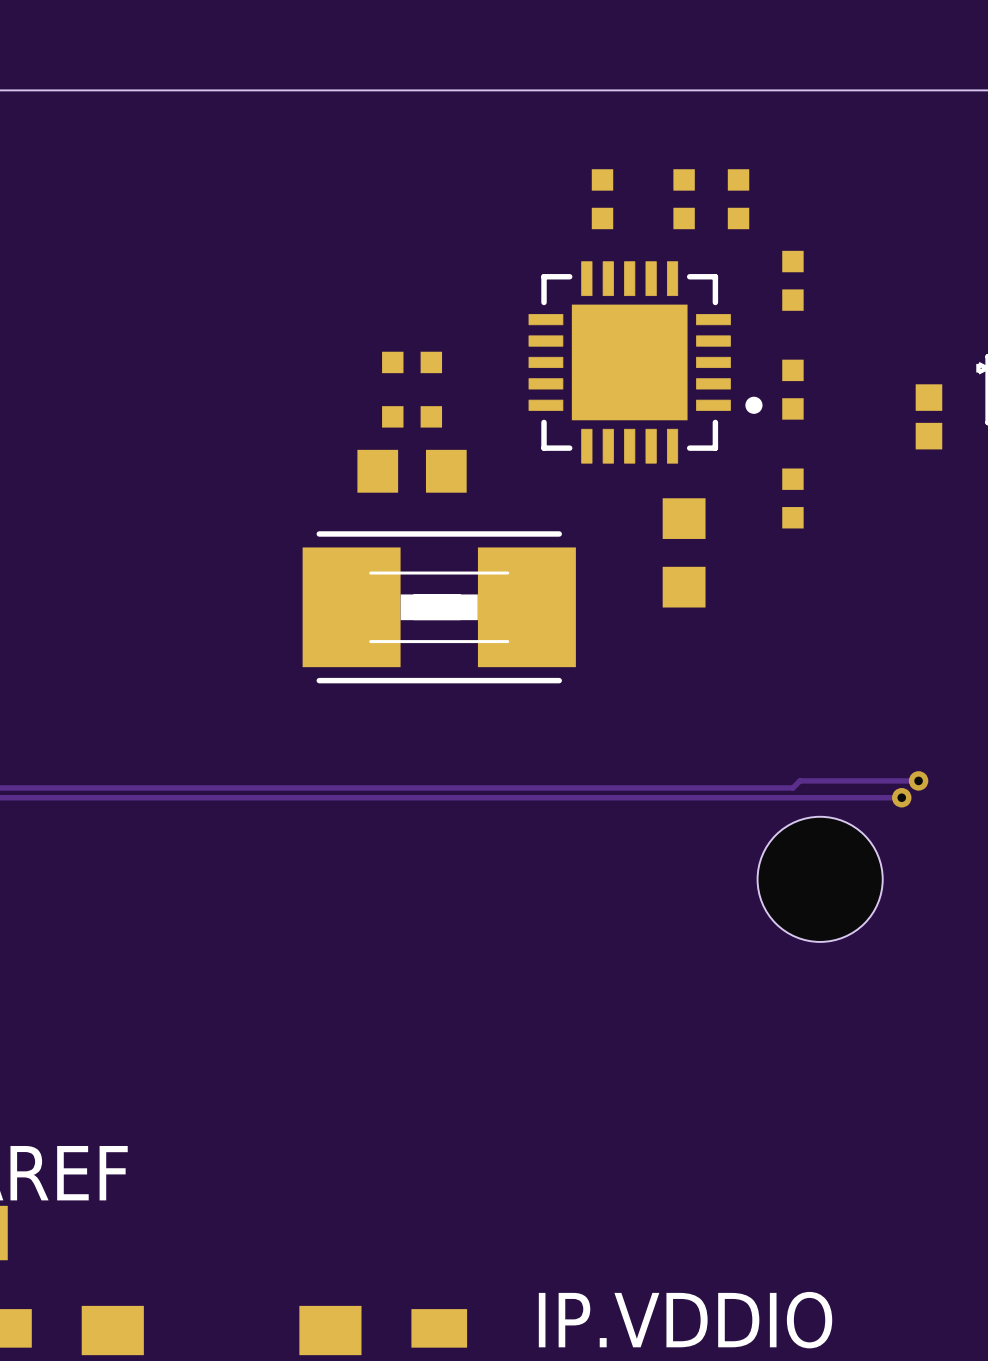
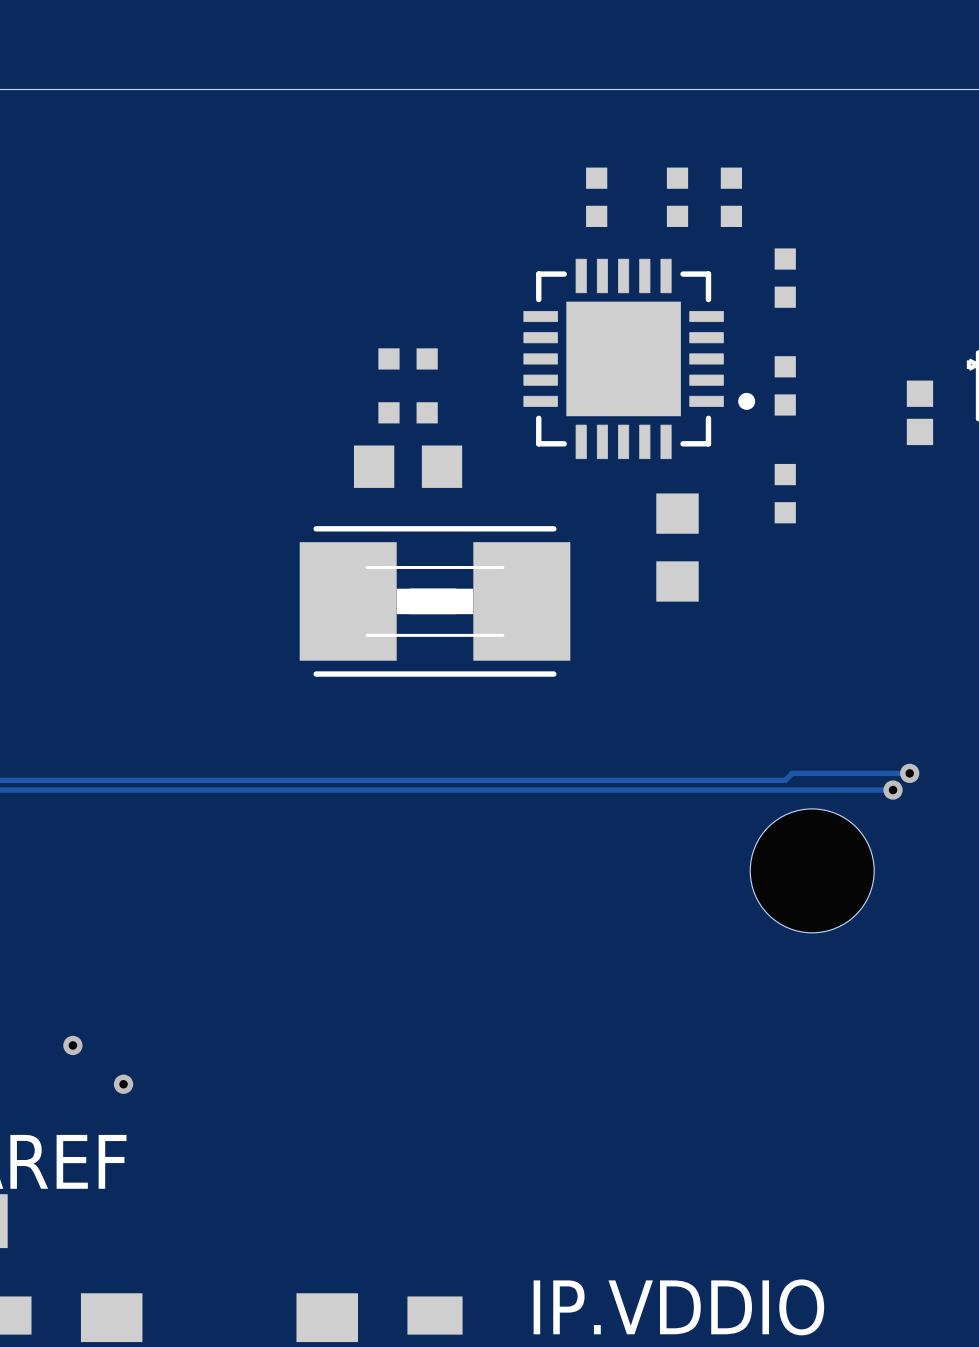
via: none -> (72, 1045)
via: none -> (123, 1084)

